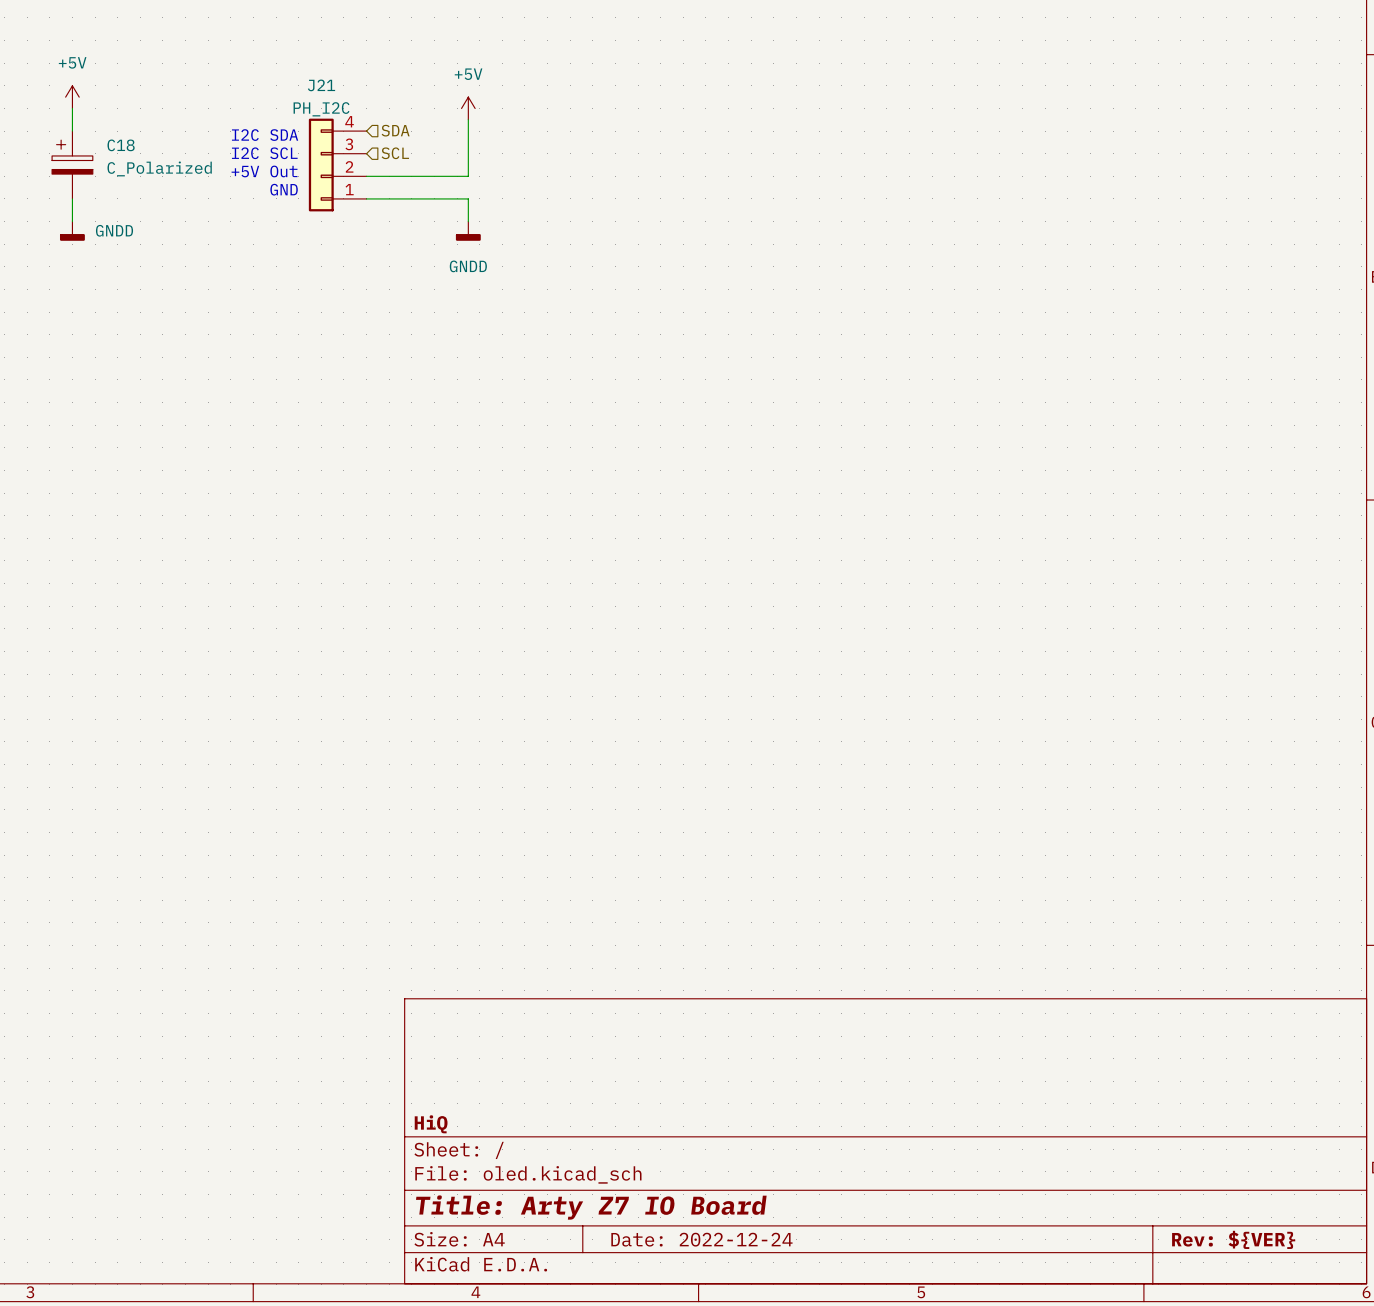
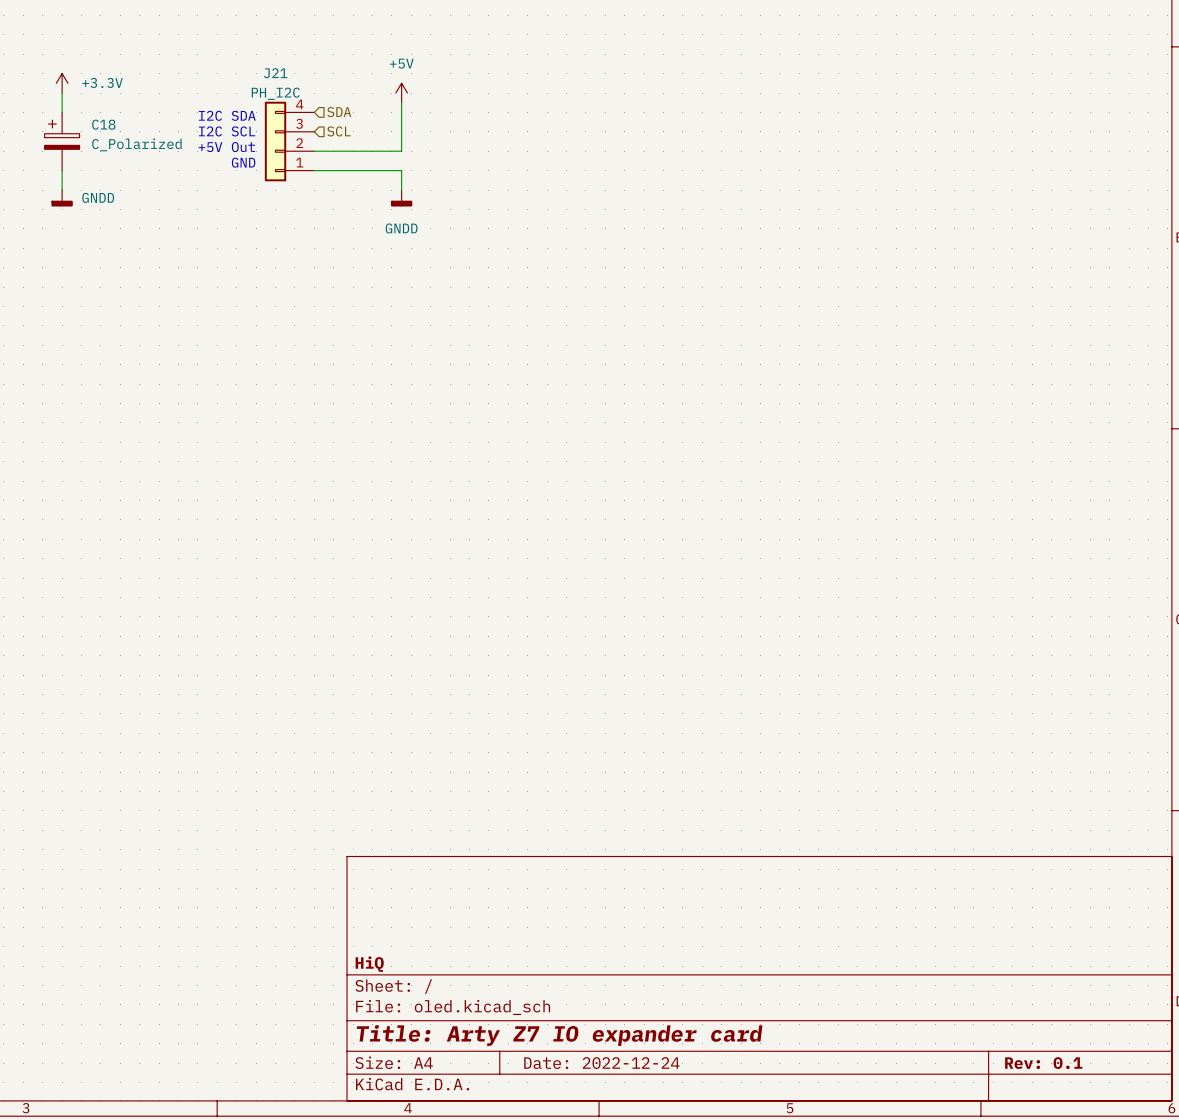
power symbol: +5V (72, 97) -> +3.3V (62, 83)
title block: Title: Arty Z7 IO Board (591, 1207) -> Title: Arty Z7 IO expander card (559, 1035)
title block: Rev: ${VER} (1233, 1239) -> Rev: 0.1 (1043, 1063)

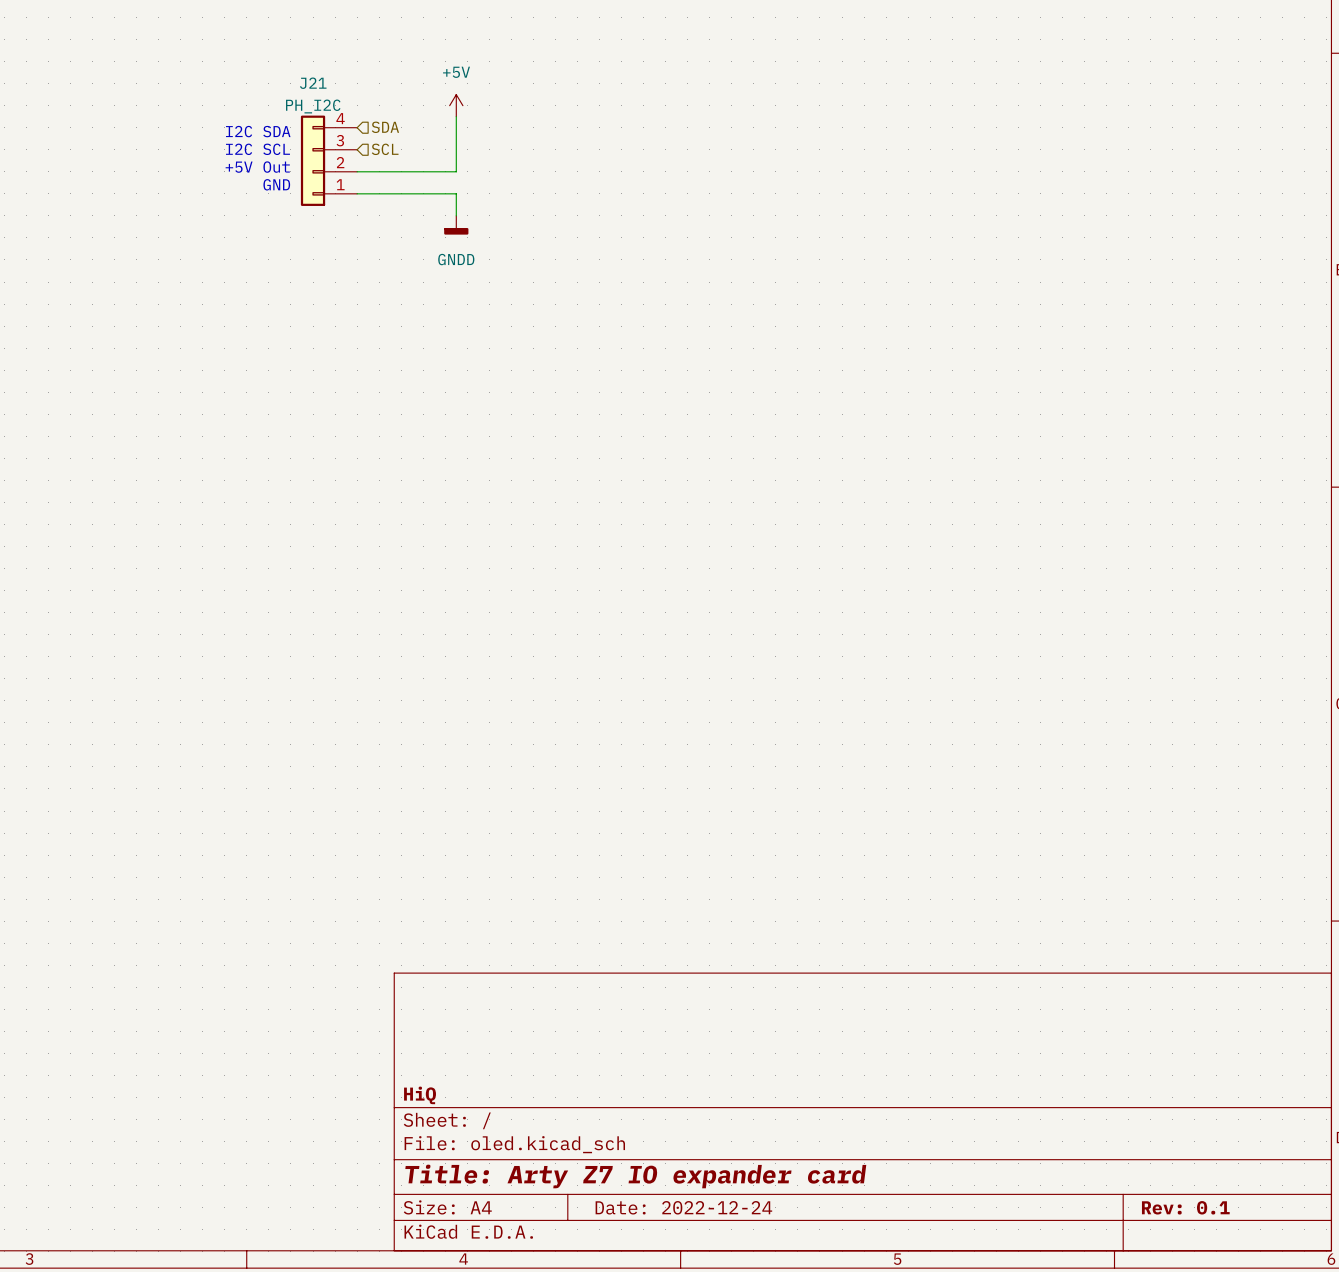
power symbol: +3.3V (62, 83) -> none
wire: (62, 93) (62, 112) -> none
C18: C_Polarized (62, 141) -> none
wire: (62, 170) (62, 190) -> none
power symbol: GNDD (62, 198) -> none

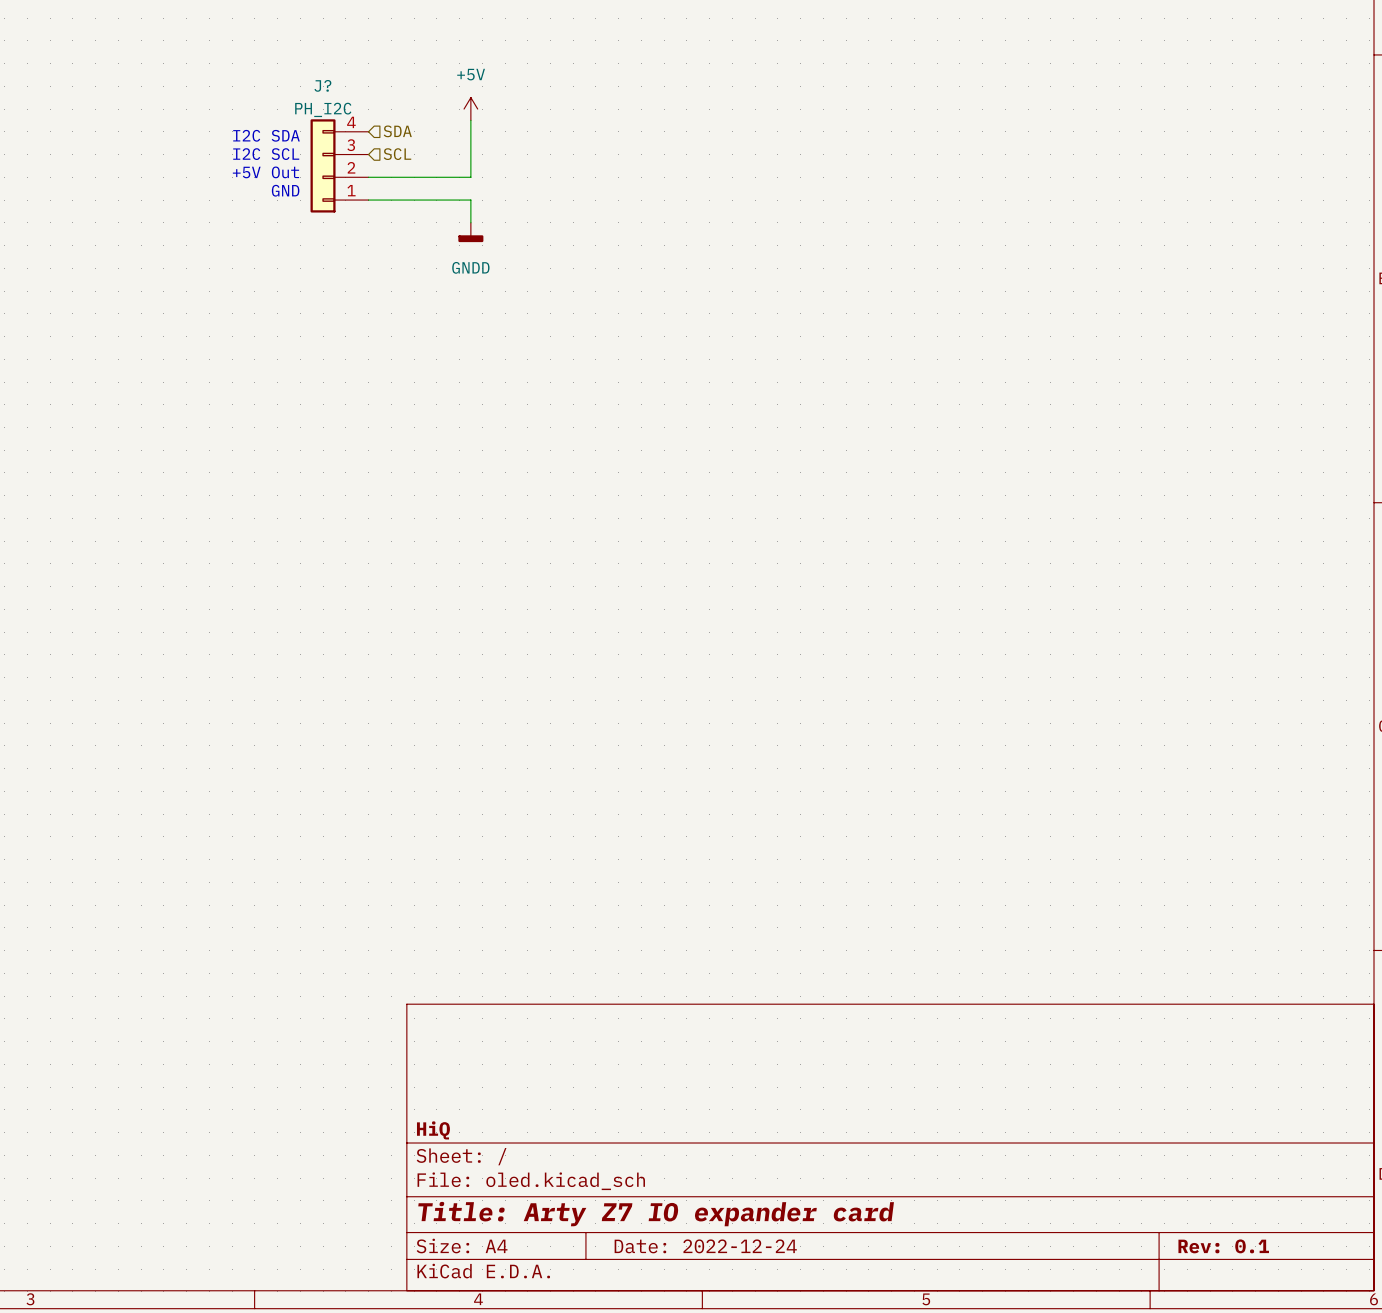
J21 name: J21 (313, 83) -> J? (322, 85)

